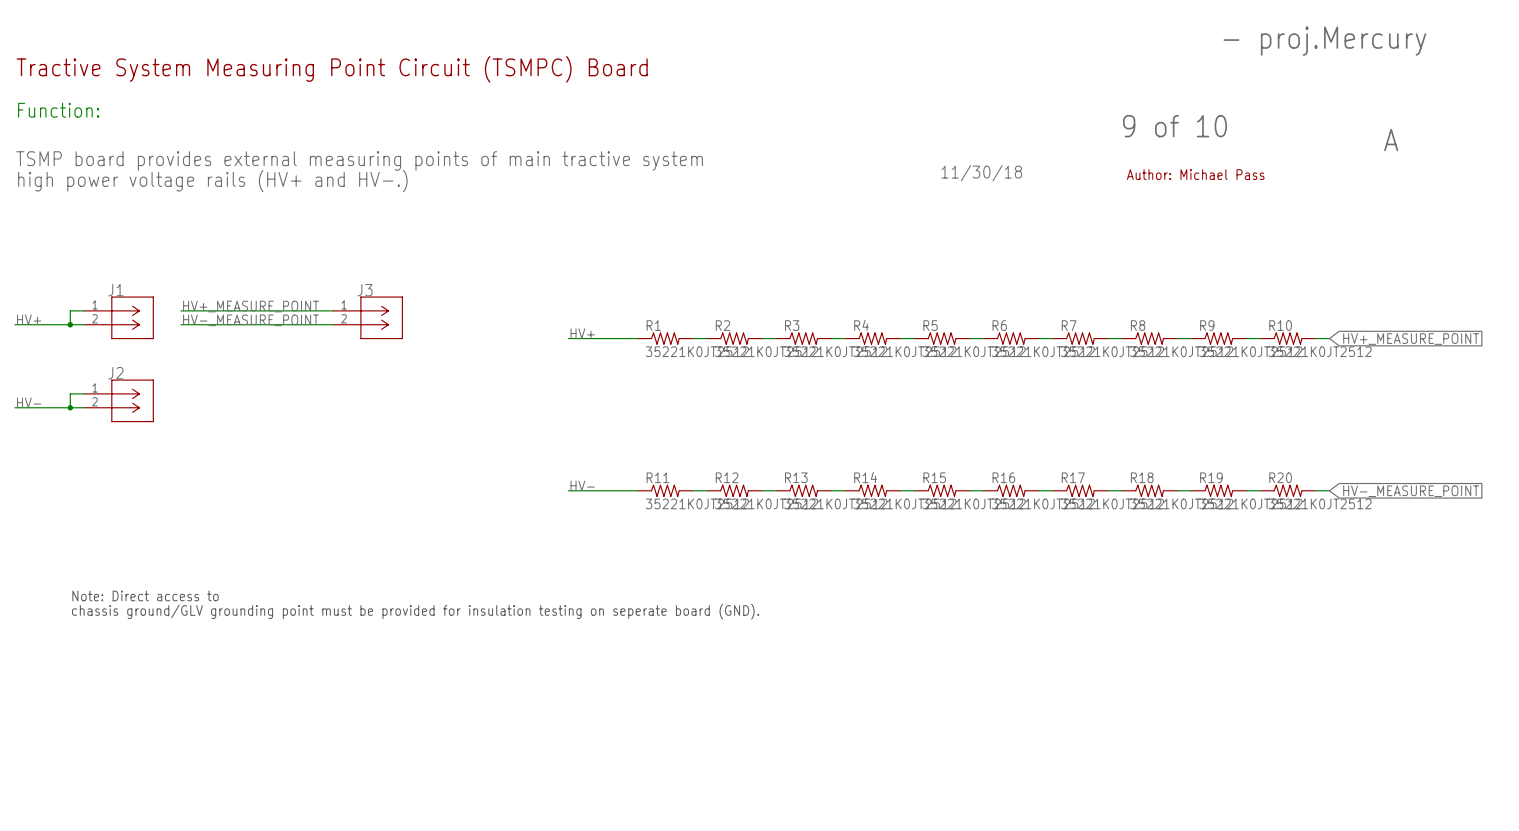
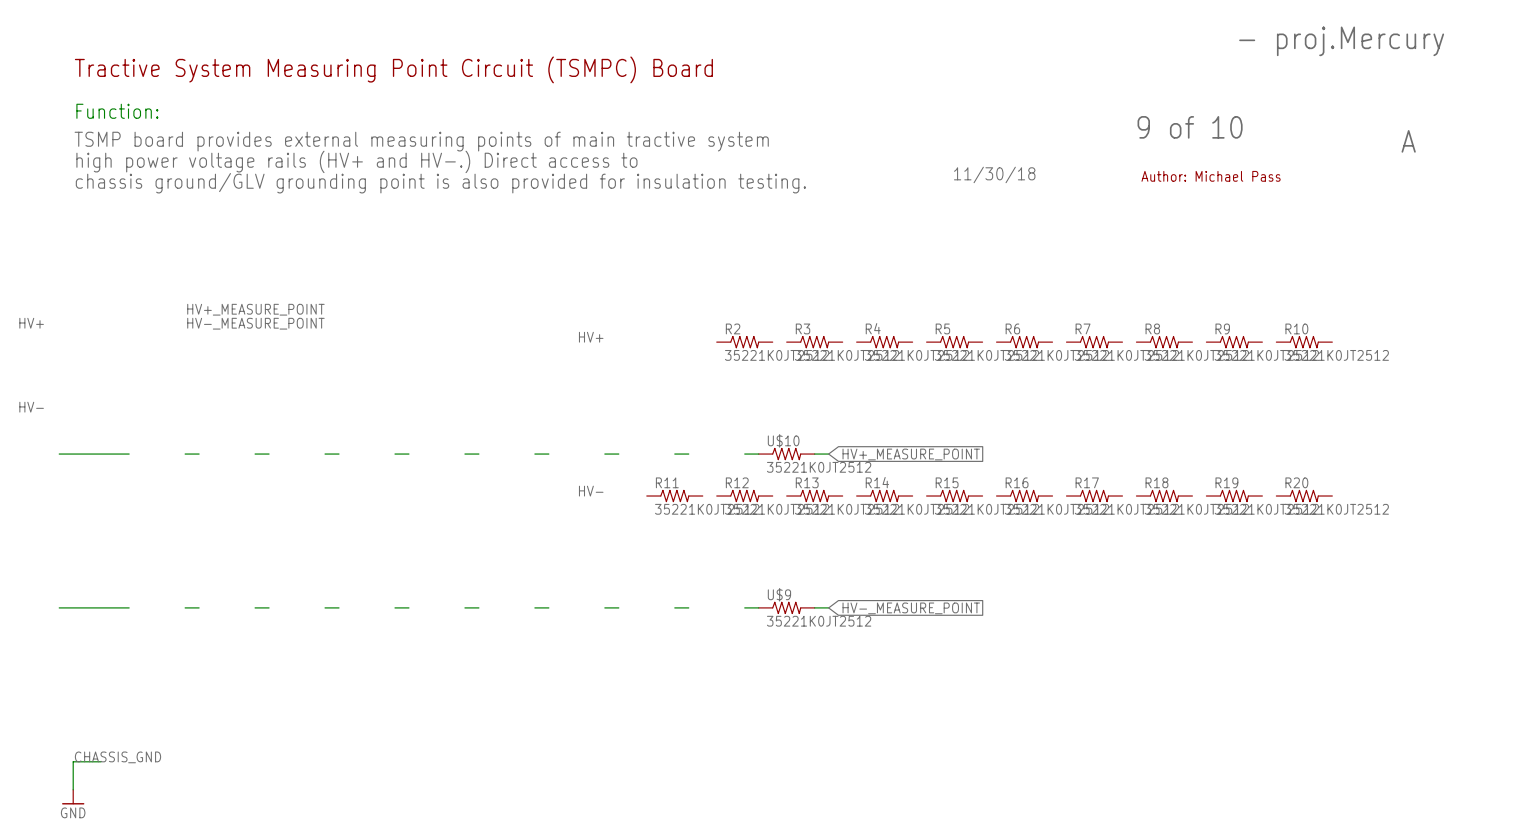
text position: Tractive System Measuring Point Circuit (TSMPC) Board (332, 69) -> Tractive System Measuring Point Circuit (TSMPC) Board (393, 69)
text position: Function: (58, 110) -> Function: (117, 111)
text position: TSMP board provides external measuring points of main tractive system (359, 160) -> TSMP board provides external measuring points of main tractive system (421, 141)
text: high power voltage rails (HV+ and HV-.) (212, 181) -> high power voltage rails (HV+ and HV-.) Direct access to (356, 161)
text: none -> chassis ground/GLV grounding point is also provided for insulation testing. (440, 183)
wire: (84, 310) (70, 310) (70, 324) -> none
wire: (181, 310) (333, 310) -> none
J1: (118, 317) -> none
J3: (368, 317) -> none
wire: (14, 324) (84, 324) -> none
junction: (70, 324) -> none
wire: (181, 324) (333, 324) -> none
wire: (568, 338) (637, 338) -> none
R1: 35221K0JT2512 (665, 338) -> none
wire: (692, 338) (706, 338) -> (674, 454) (688, 454)
wire: (762, 338) (776, 338) -> (744, 454) (758, 454)
wire: (831, 338) (845, 338) -> (814, 454) (828, 454)
wire: (900, 338) (914, 338) -> none
wire: (969, 338) (983, 338) -> none
wire: (1038, 338) (1052, 338) -> none
wire: (1108, 338) (1121, 338) -> none
wire: (1177, 338) (1191, 338) -> none
wire: (1246, 338) (1260, 338) -> none
wire: (1315, 338) (1329, 338) -> none
global label: HV+_MEASURE_POINT (1411, 339) -> none
wire: (84, 393) (70, 393) (70, 407) -> none
J2: (118, 400) -> none
wire: (14, 407) (84, 407) -> (59, 454) (129, 454)
junction: (70, 407) -> none
wire: none -> (185, 454) (199, 454)
wire: none -> (255, 454) (269, 454)
wire: none -> (325, 454) (339, 454)
wire: none -> (394, 454) (408, 454)
wire: none -> (464, 454) (478, 454)
wire: none -> (534, 454) (548, 454)
wire: none -> (604, 454) (618, 454)
U$10: none -> 35221K0JT2512 (786, 454)
global label: none -> HV+_MEASURE_POINT (911, 454)
wire: (568, 490) (637, 490) -> none
wire: (692, 490) (706, 490) -> (674, 607) (688, 607)
wire: (762, 490) (776, 490) -> (744, 607) (758, 607)
wire: (831, 490) (845, 490) -> (814, 607) (828, 607)
wire: (900, 490) (914, 490) -> none
wire: (969, 490) (983, 490) -> none
wire: (1038, 490) (1052, 490) -> none
wire: (1108, 490) (1121, 490) -> none
wire: (1177, 490) (1191, 490) -> none
wire: (1246, 490) (1260, 490) -> none
wire: (1315, 490) (1329, 490) -> none
global label: HV-_MEASURE_POINT (1411, 491) -> none
text: Note: Direct access to (145, 595) -> none
wire: none -> (59, 607) (129, 607)
wire: none -> (185, 607) (199, 607)
wire: none -> (255, 607) (269, 607)
wire: none -> (325, 607) (339, 607)
wire: none -> (394, 607) (408, 607)
wire: none -> (464, 607) (478, 607)
wire: none -> (534, 607) (548, 607)
wire: none -> (604, 607) (618, 607)
U$9: none -> 35221K0JT2512 (786, 607)
global label: none -> HV-_MEASURE_POINT (911, 608)
text: chassis ground/GLV grounding point must be provided for insulation testing on seperate board (GND). (415, 611) -> none
label: none -> CHASSIS_GND (118, 757)
wire: none -> (101, 761) (73, 761) (73, 789)
power symbol: none -> GND (73, 797)

